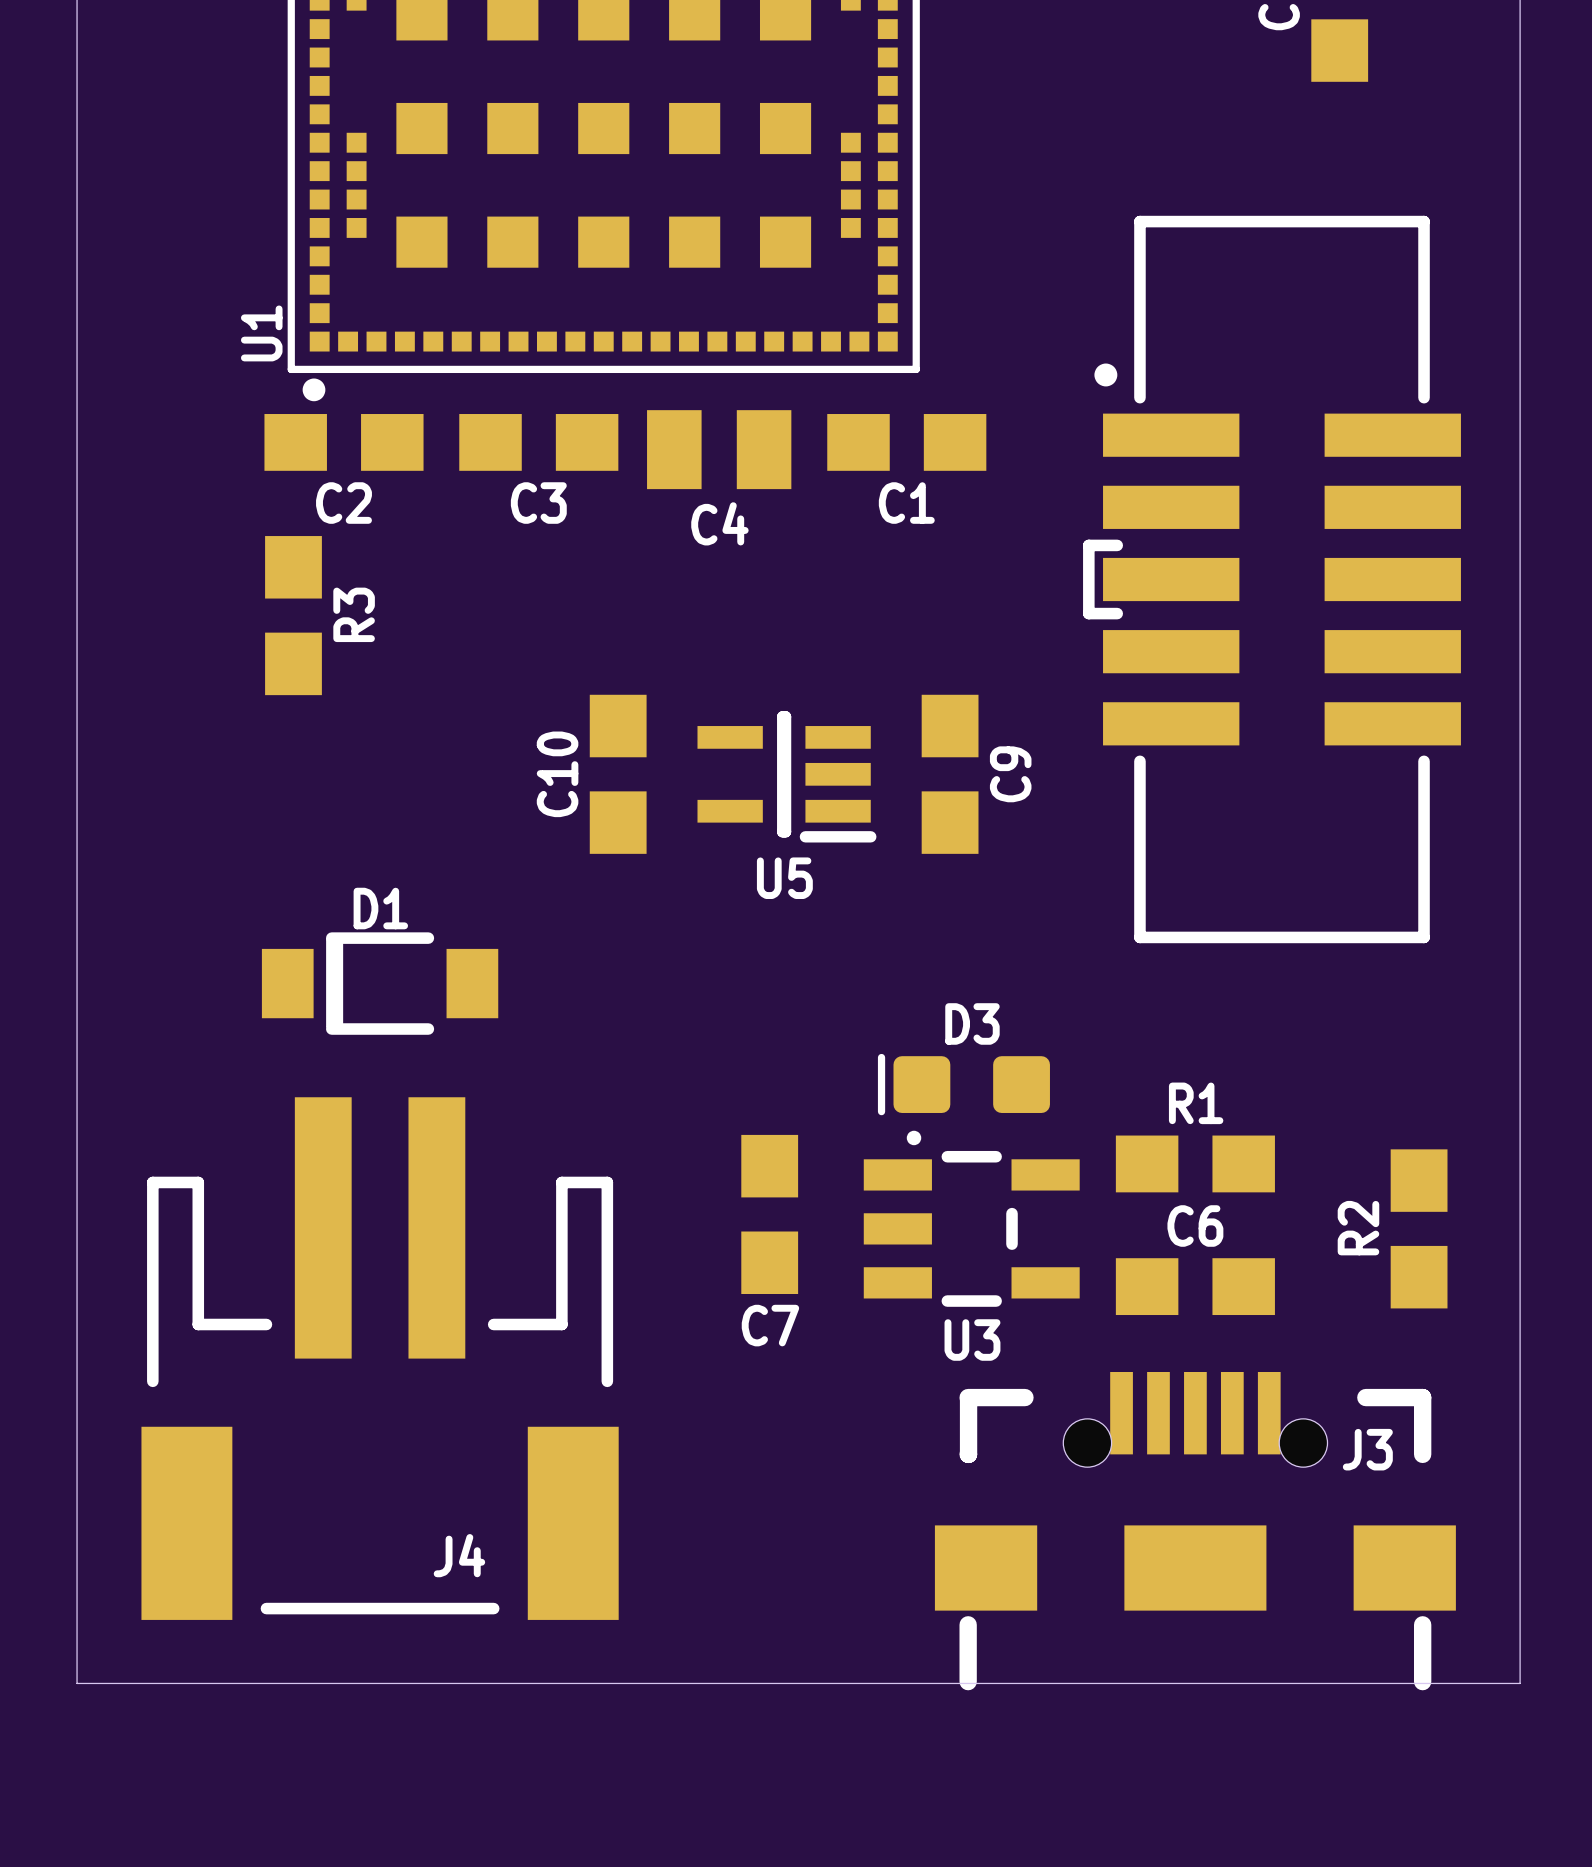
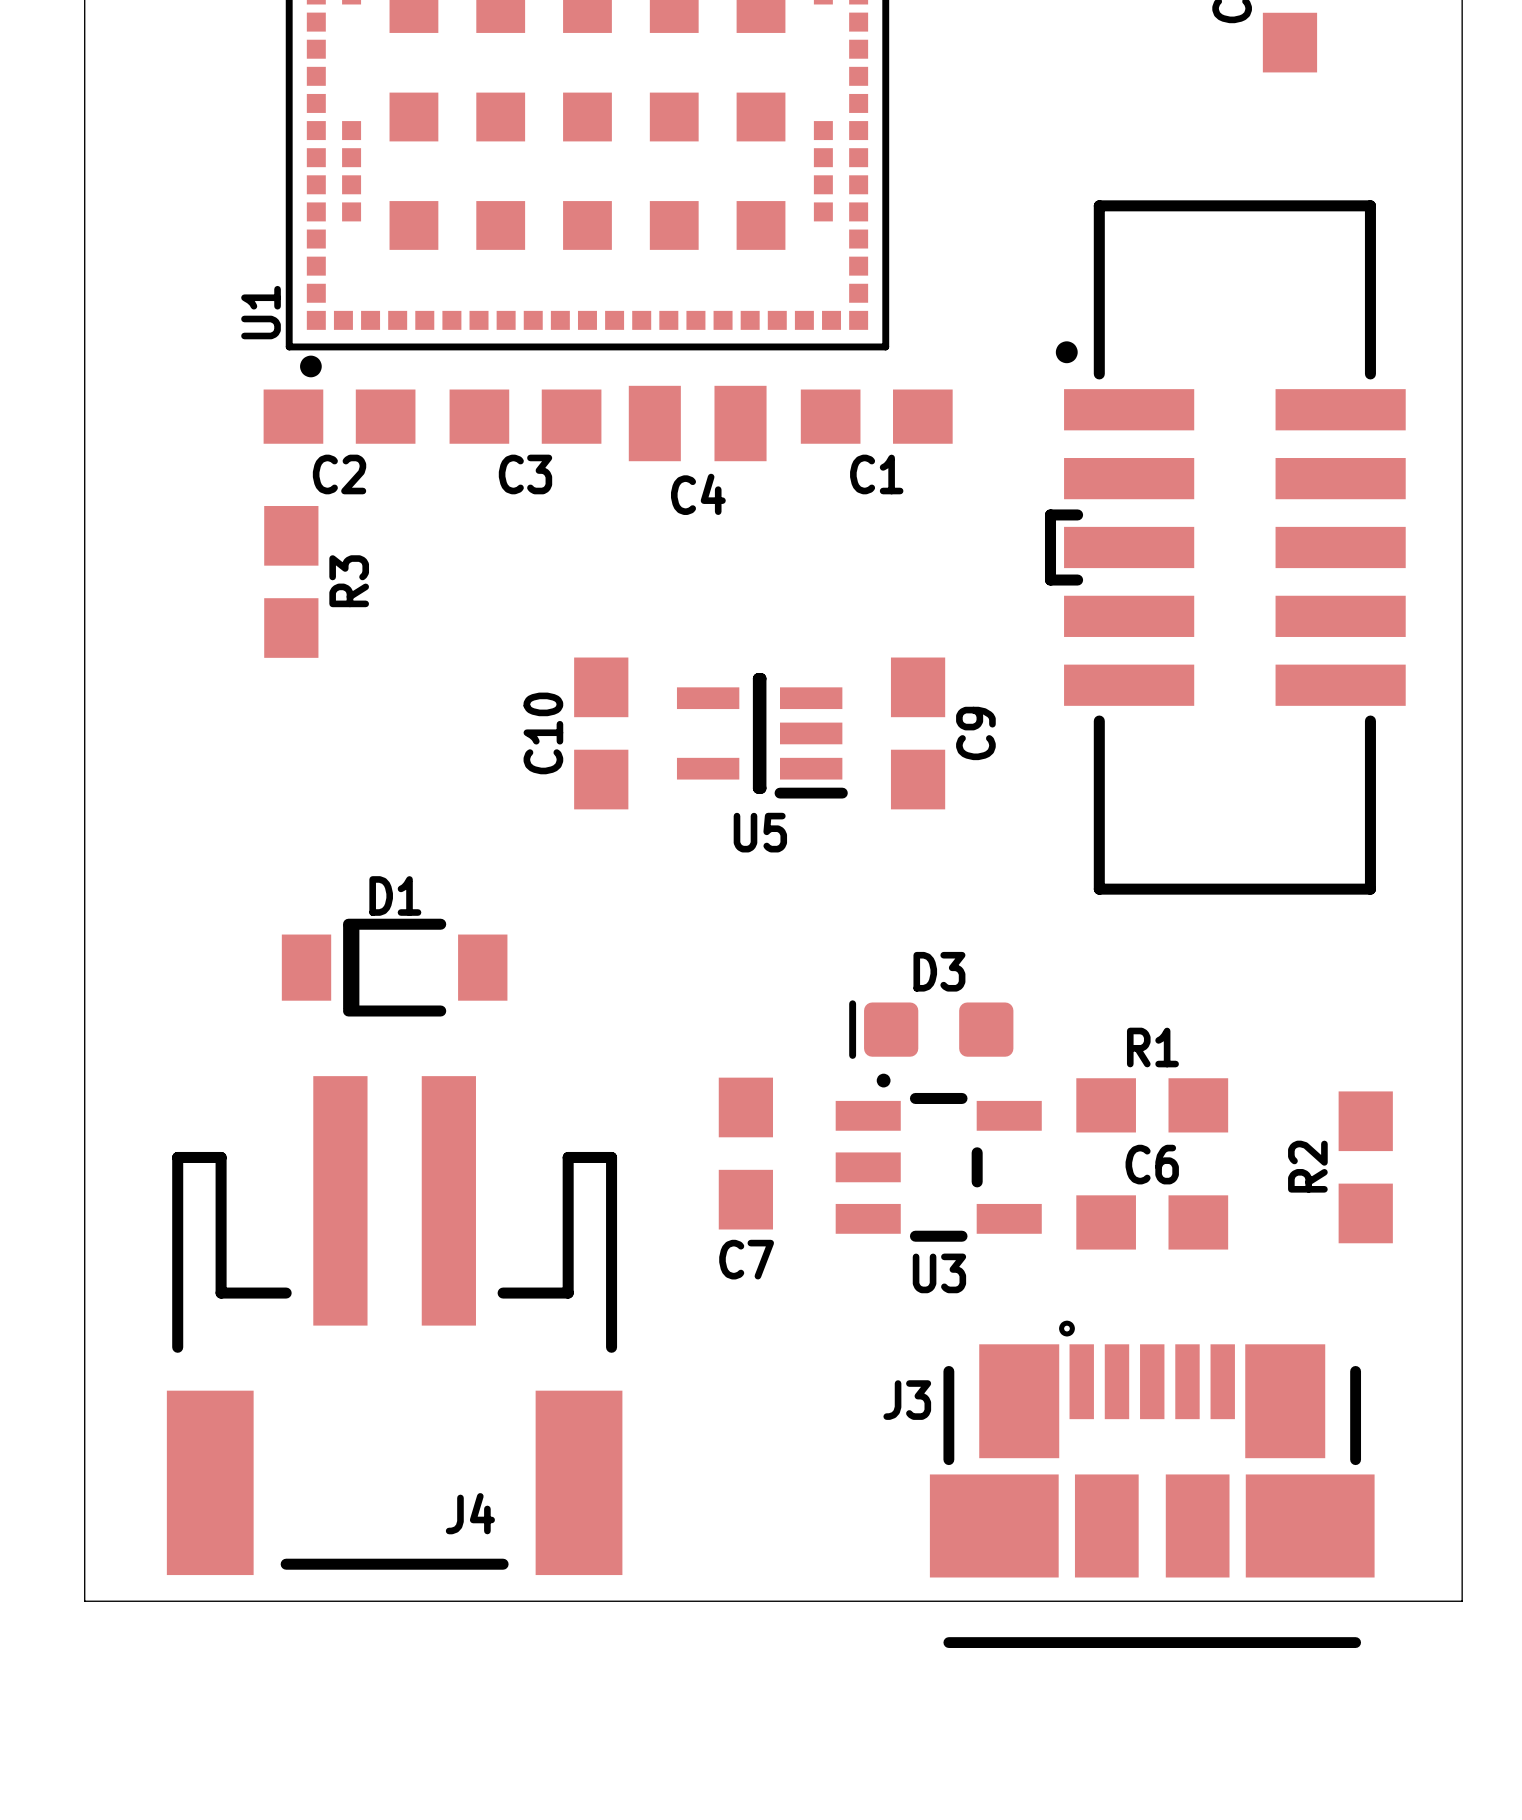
D1 position: (380, 983) -> (394, 967)
J4 position: (380, 1358) -> (394, 1325)
J3 footprint: [934, 1372, 1456, 1691] -> [929, 1320, 1375, 1648]
J3 name position: J3 (1367, 1449) -> J3 (907, 1400)

